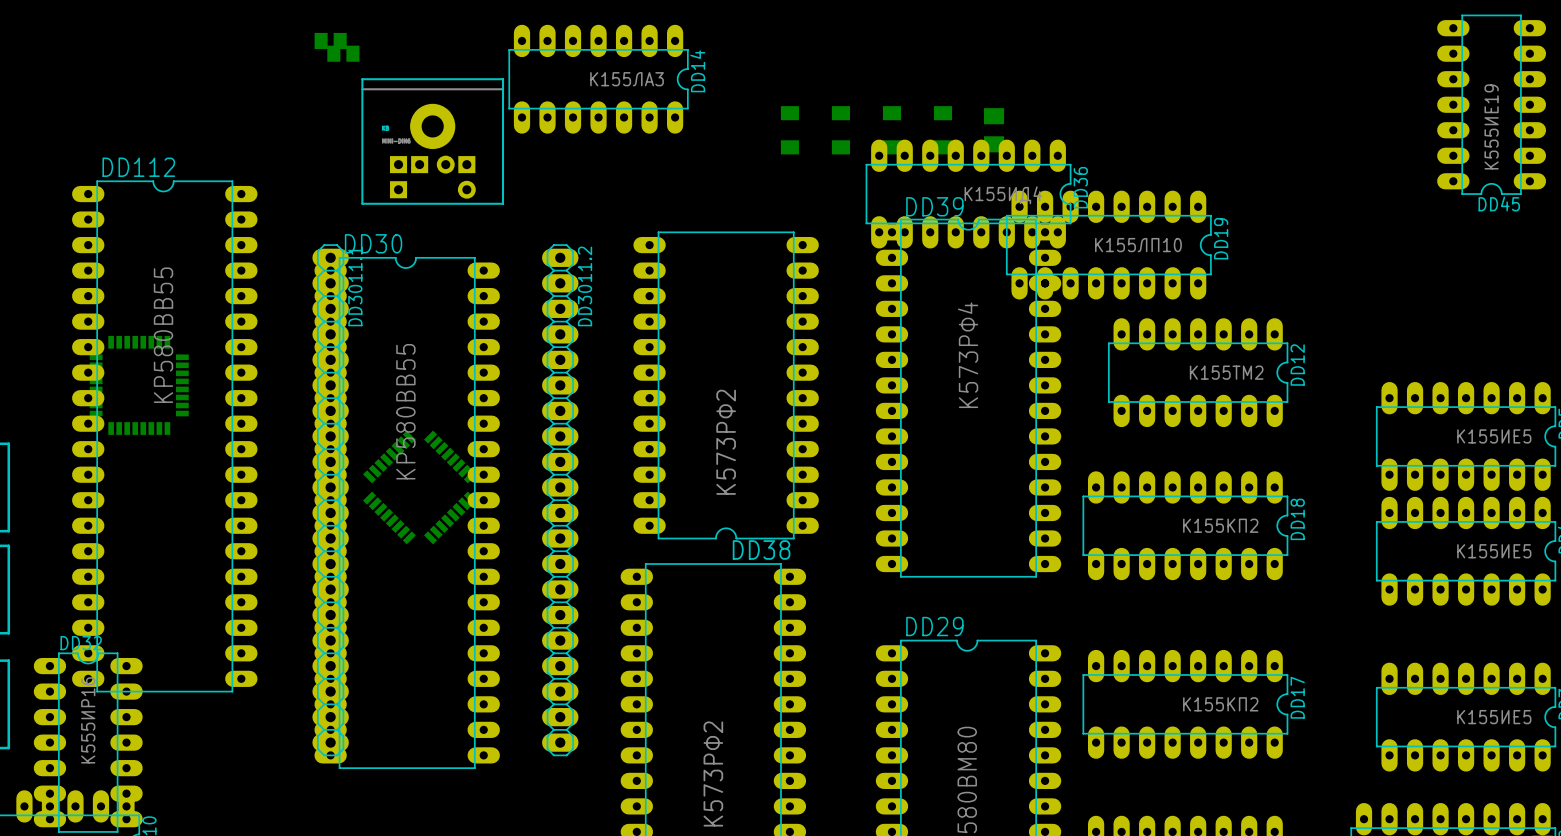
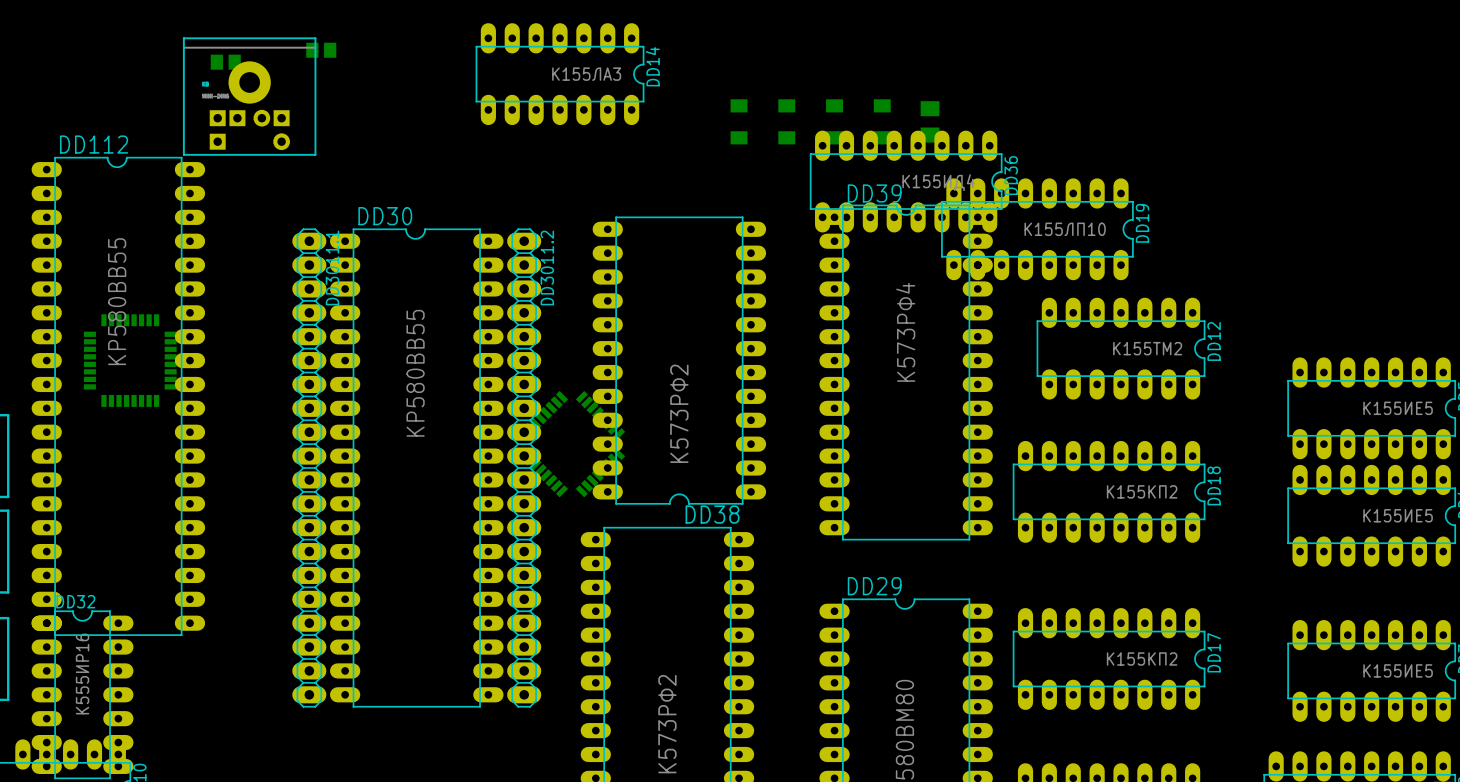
part position: (330, 40) -> (225, 62)
DD45: К555ИЕ19 (1491, 104) -> none
part position: (432, 141) -> (249, 96)
DD112 position: (164, 436) -> (118, 396)
part position: (419, 487) -> (571, 444)
DD30 position: (407, 512) -> (416, 468)

